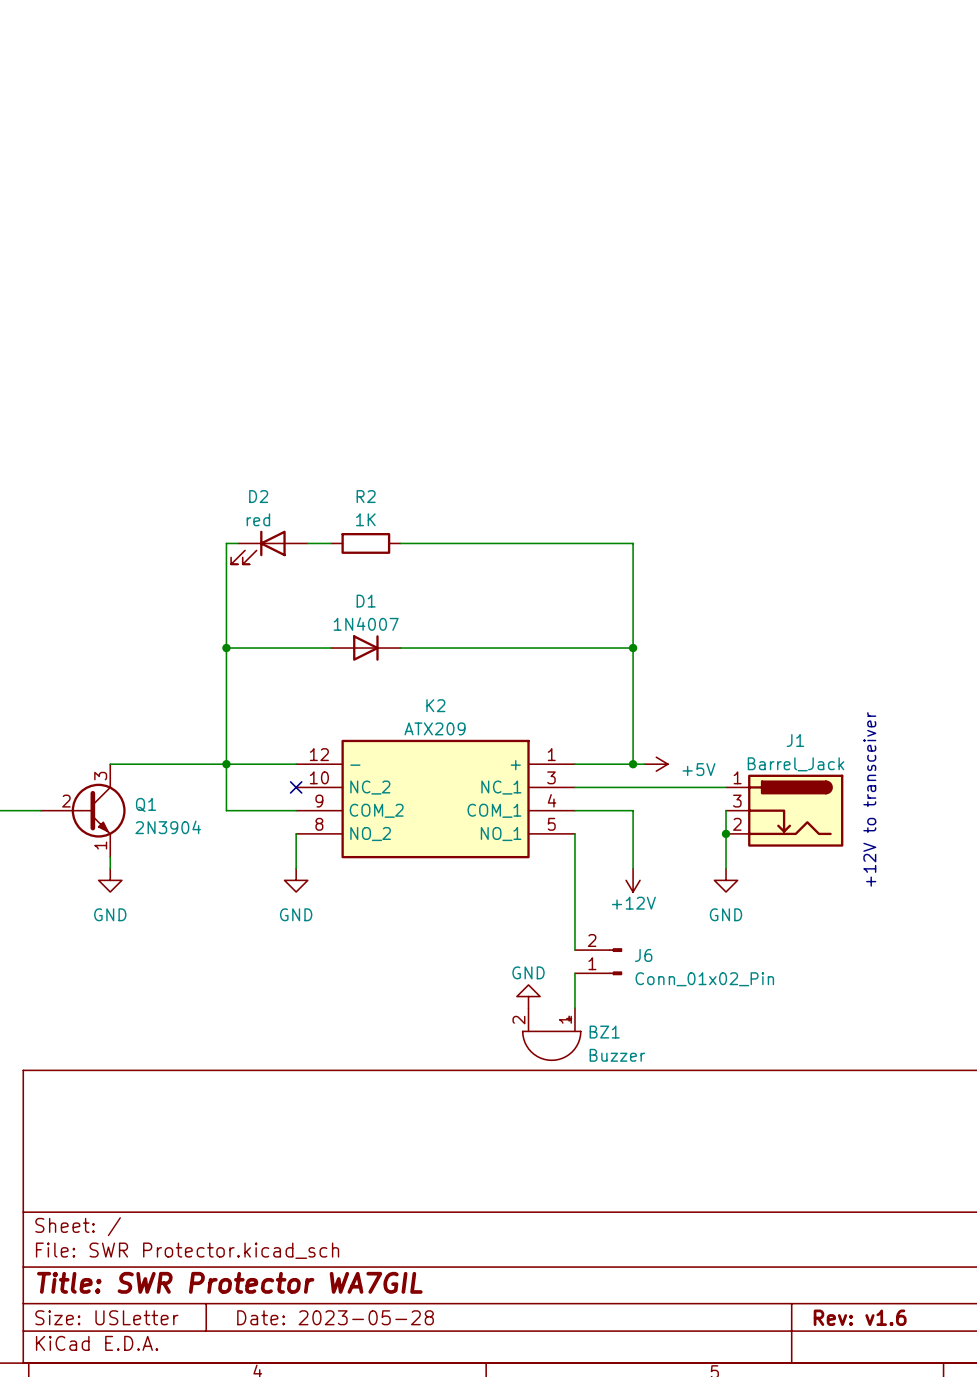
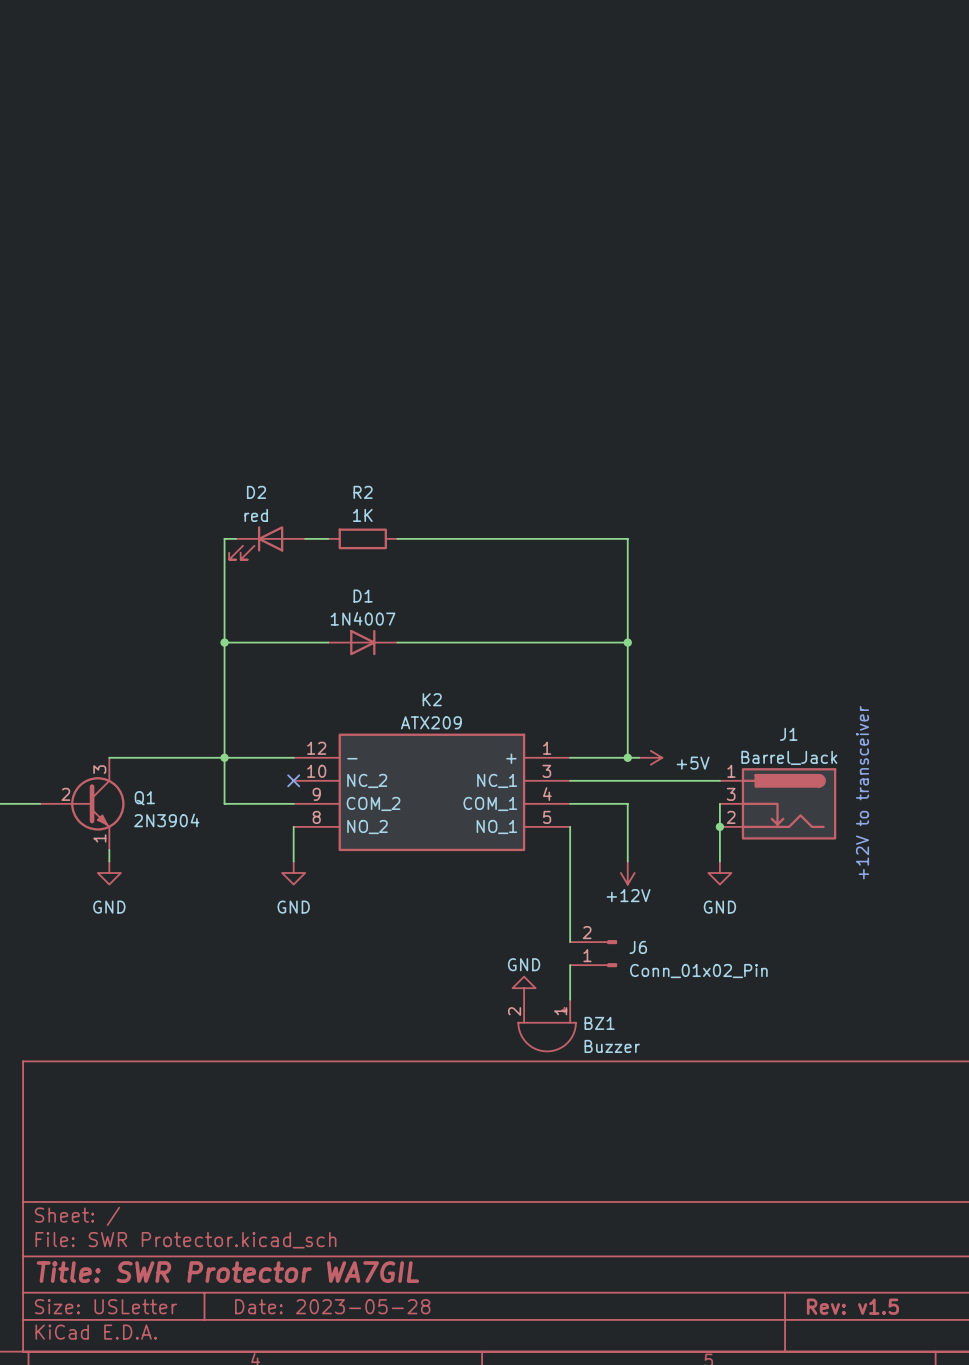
title block: Rev: v1.6 (860, 1317) -> Rev: v1.5 (852, 1306)

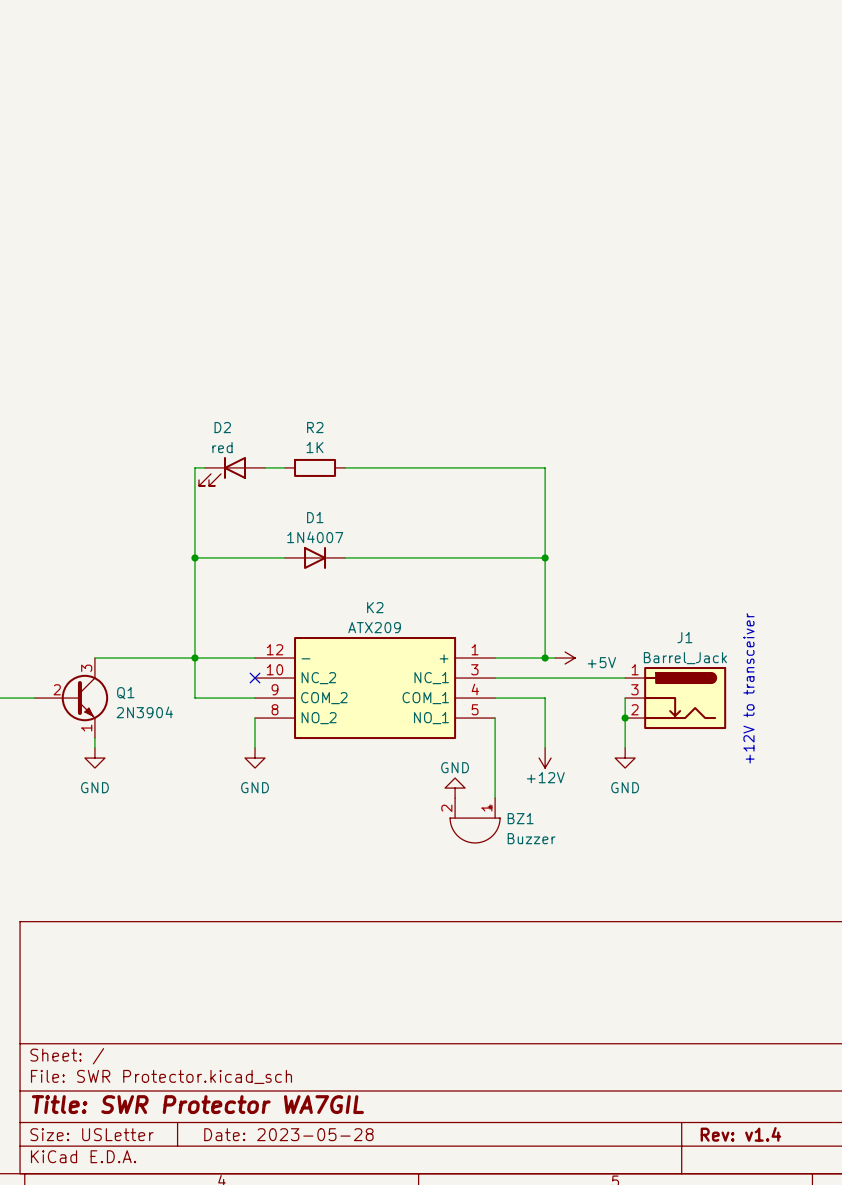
J6: Conn_01x02_Pin (593, 953) -> none
wire: (570, 965) (570, 999) -> none
power symbol position: GND (524, 988) -> GND (455, 788)
BZ1 position: (547, 1025) -> (475, 820)
title block: Rev: v1.5 (852, 1306) -> Rev: v1.4 (740, 1134)

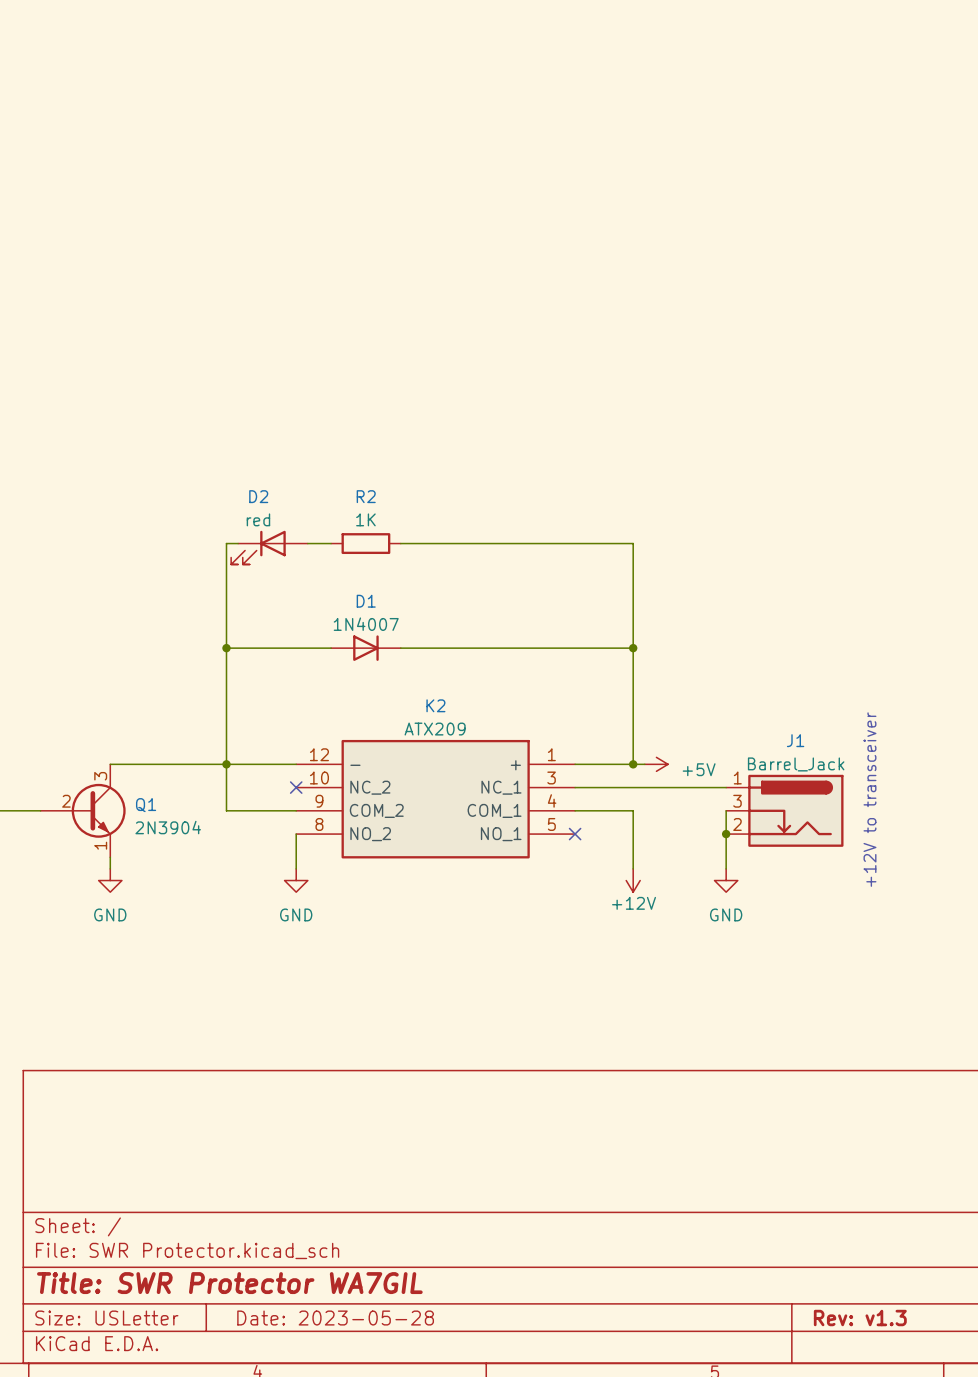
wire: (495, 718) (495, 798) -> none
no-connect mark: none -> (575, 834)
power symbol: GND (455, 788) -> none
BZ1: Buzzer (475, 820) -> none
title block: Rev: v1.4 (740, 1134) -> Rev: v1.3 (860, 1318)

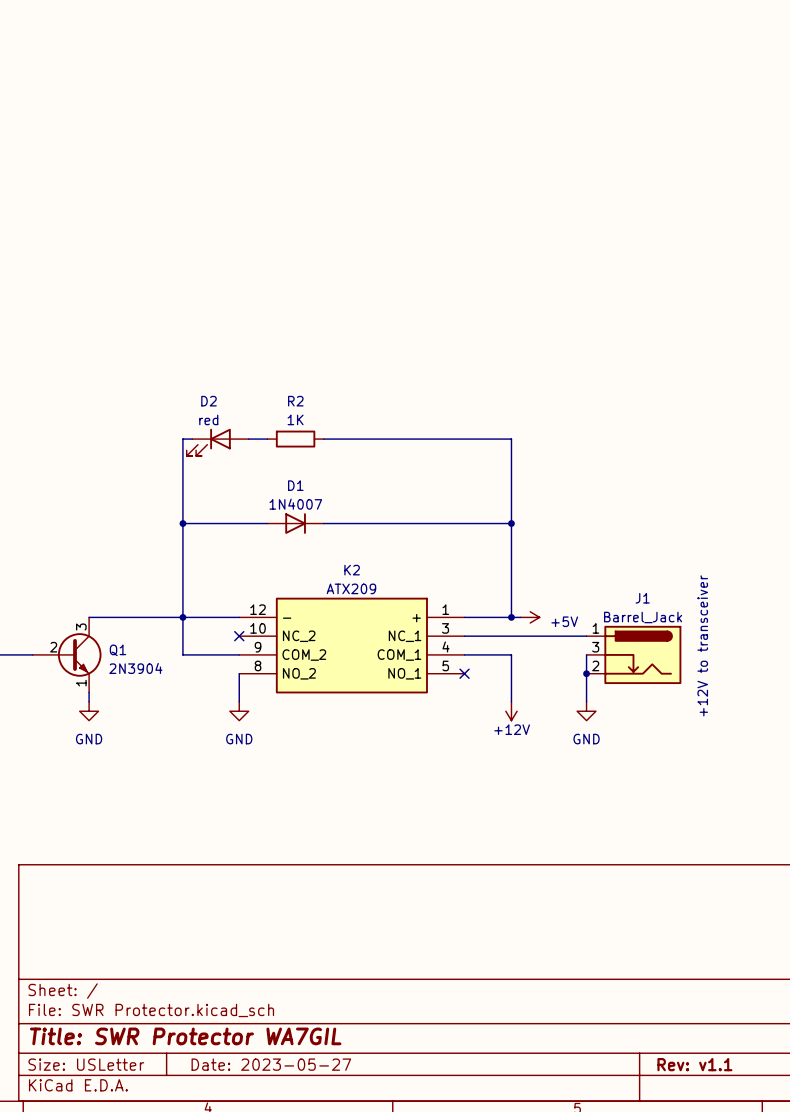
title block: Date: 2023-05-28 (335, 1318) -> Date: 2023-05-27 (271, 1064)
title block: Rev: v1.3 (860, 1318) -> Rev: v1.1 (694, 1064)

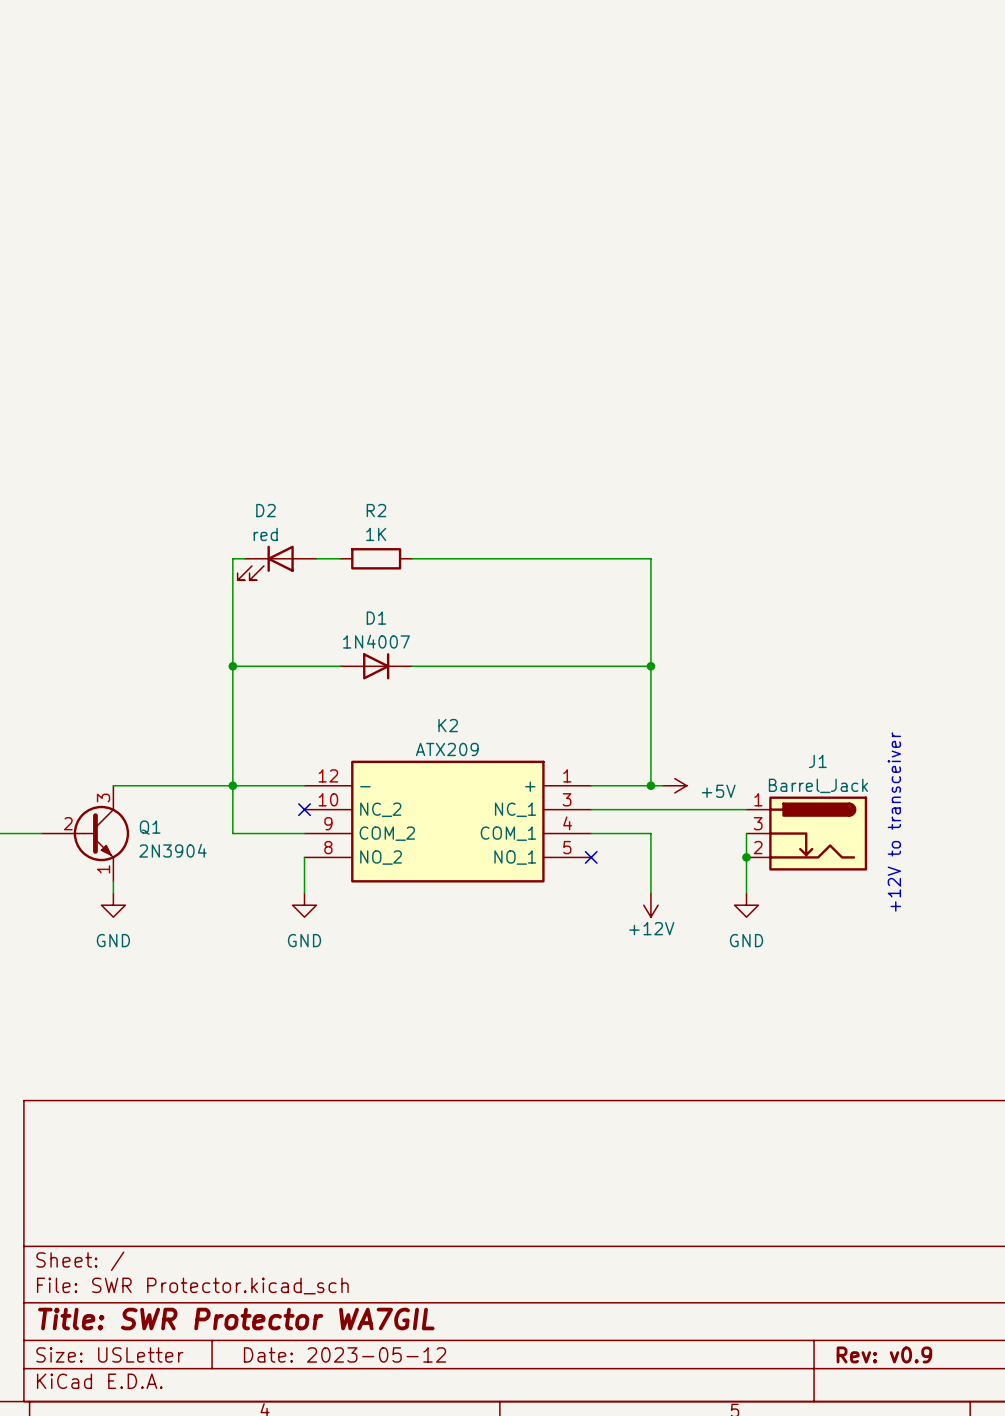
title block: Date: 2023-05-27 (271, 1064) -> Date: 2023-05-12 (345, 1354)
title block: Rev: v1.1 (694, 1064) -> Rev: v0.9 (884, 1354)

